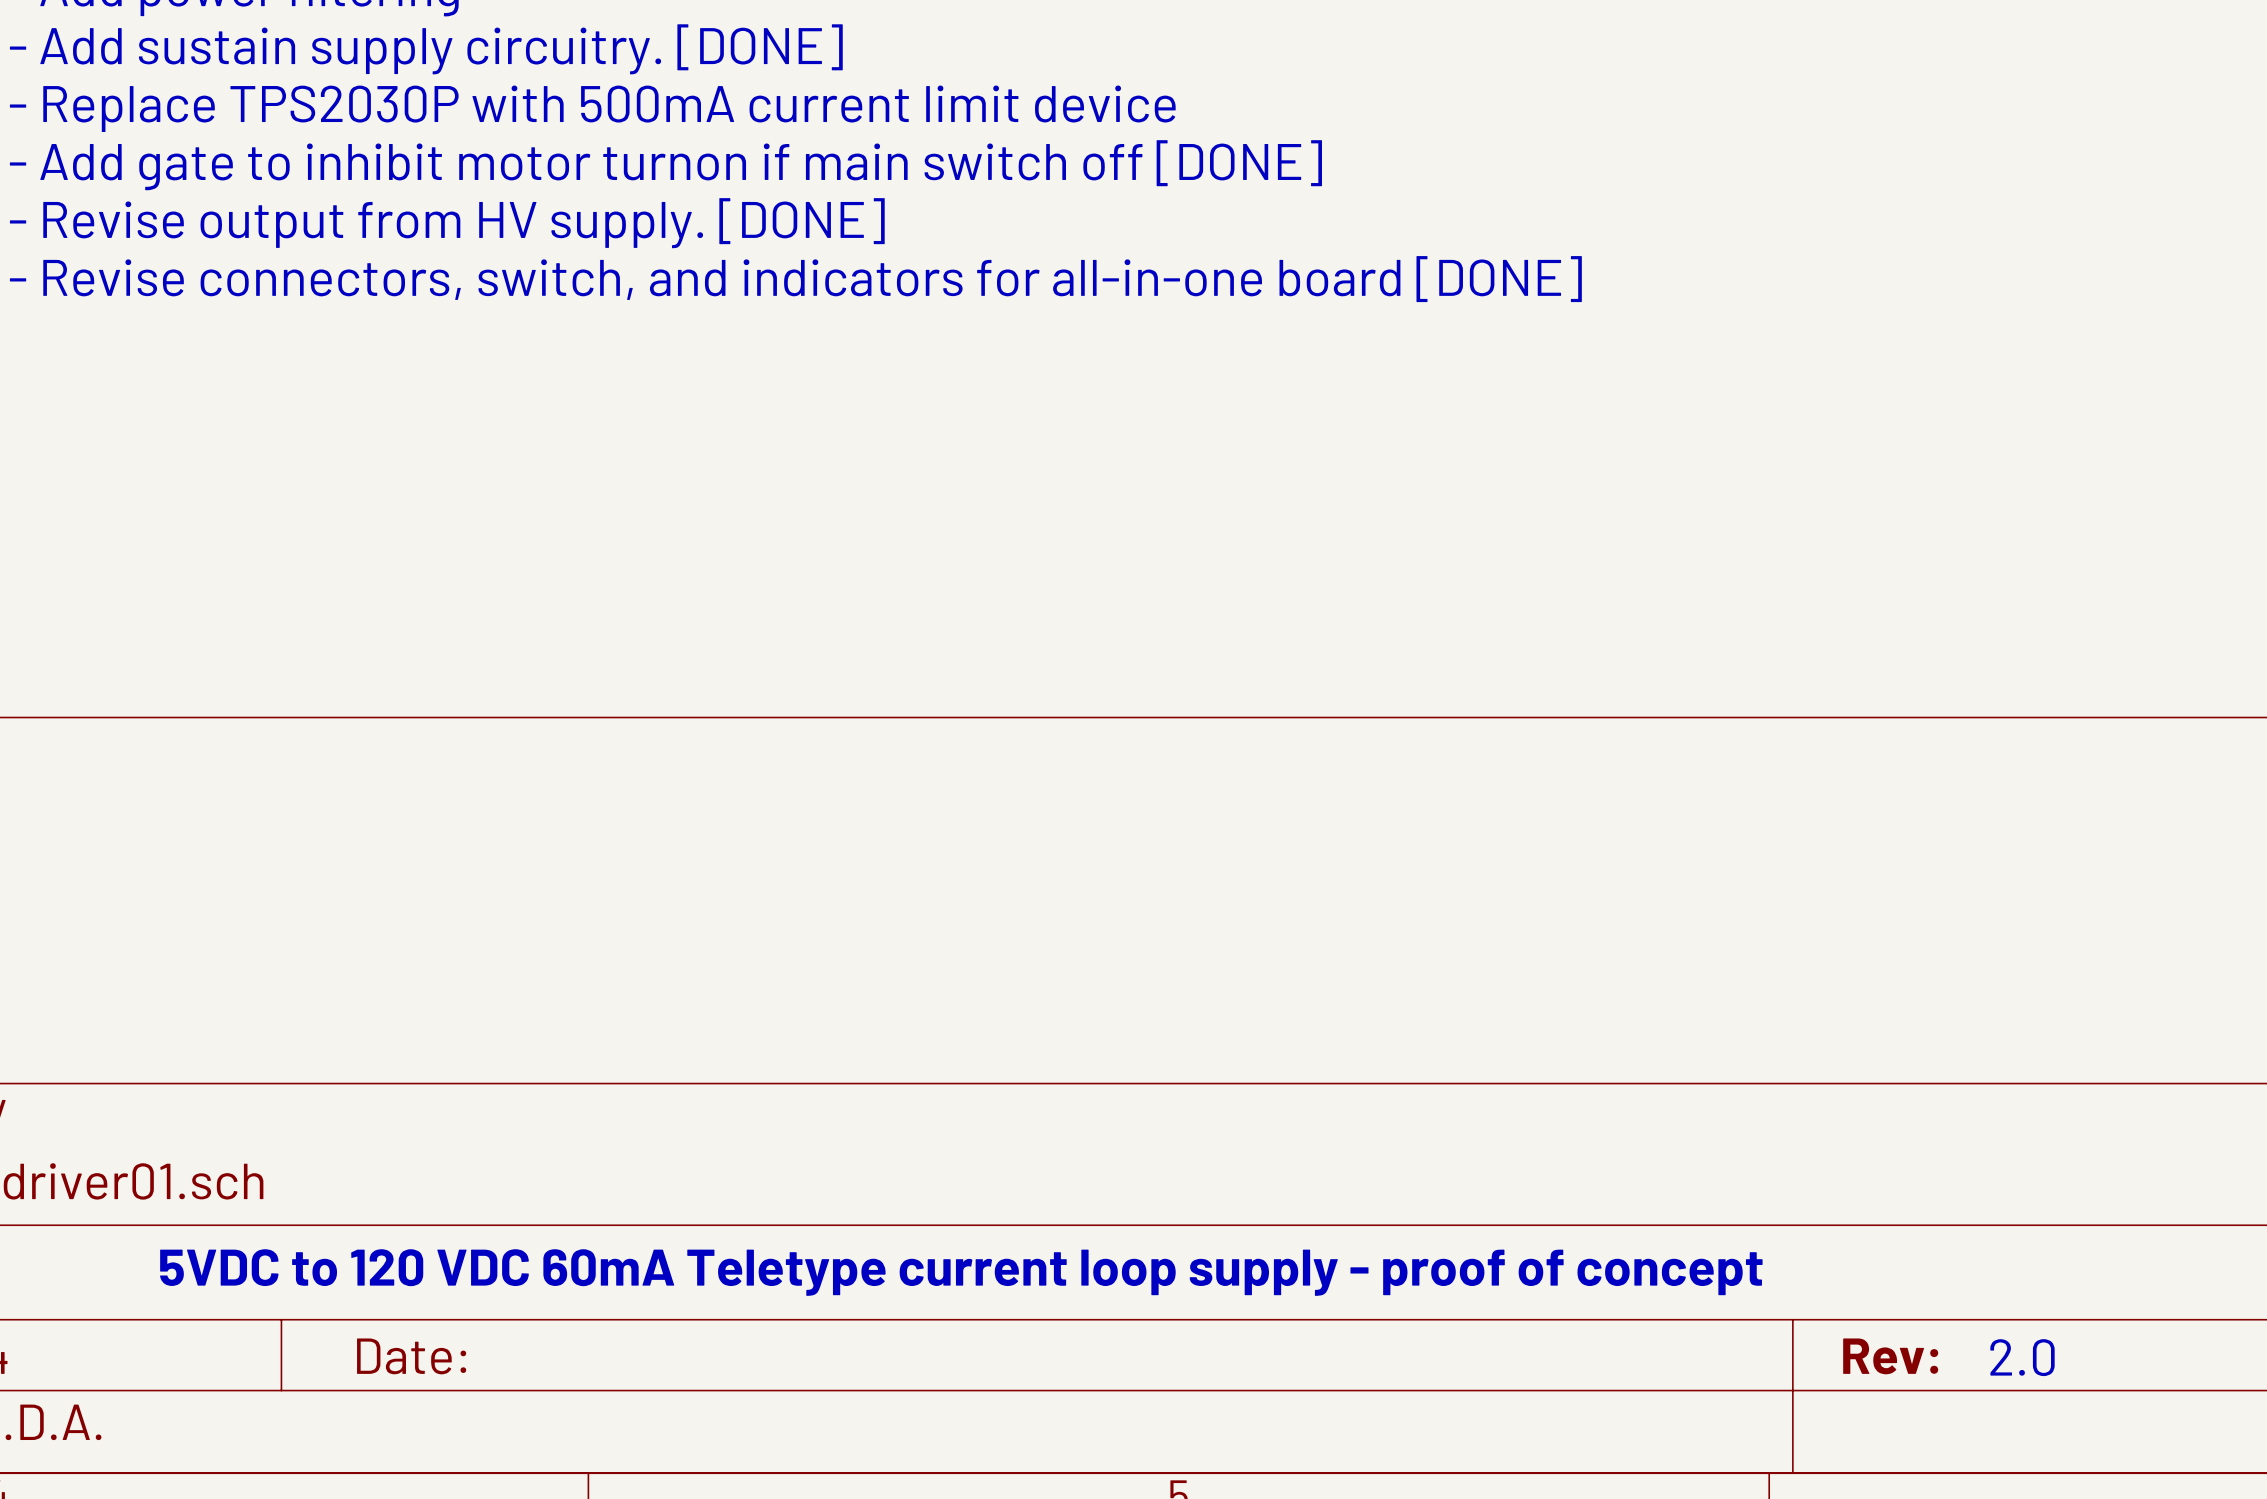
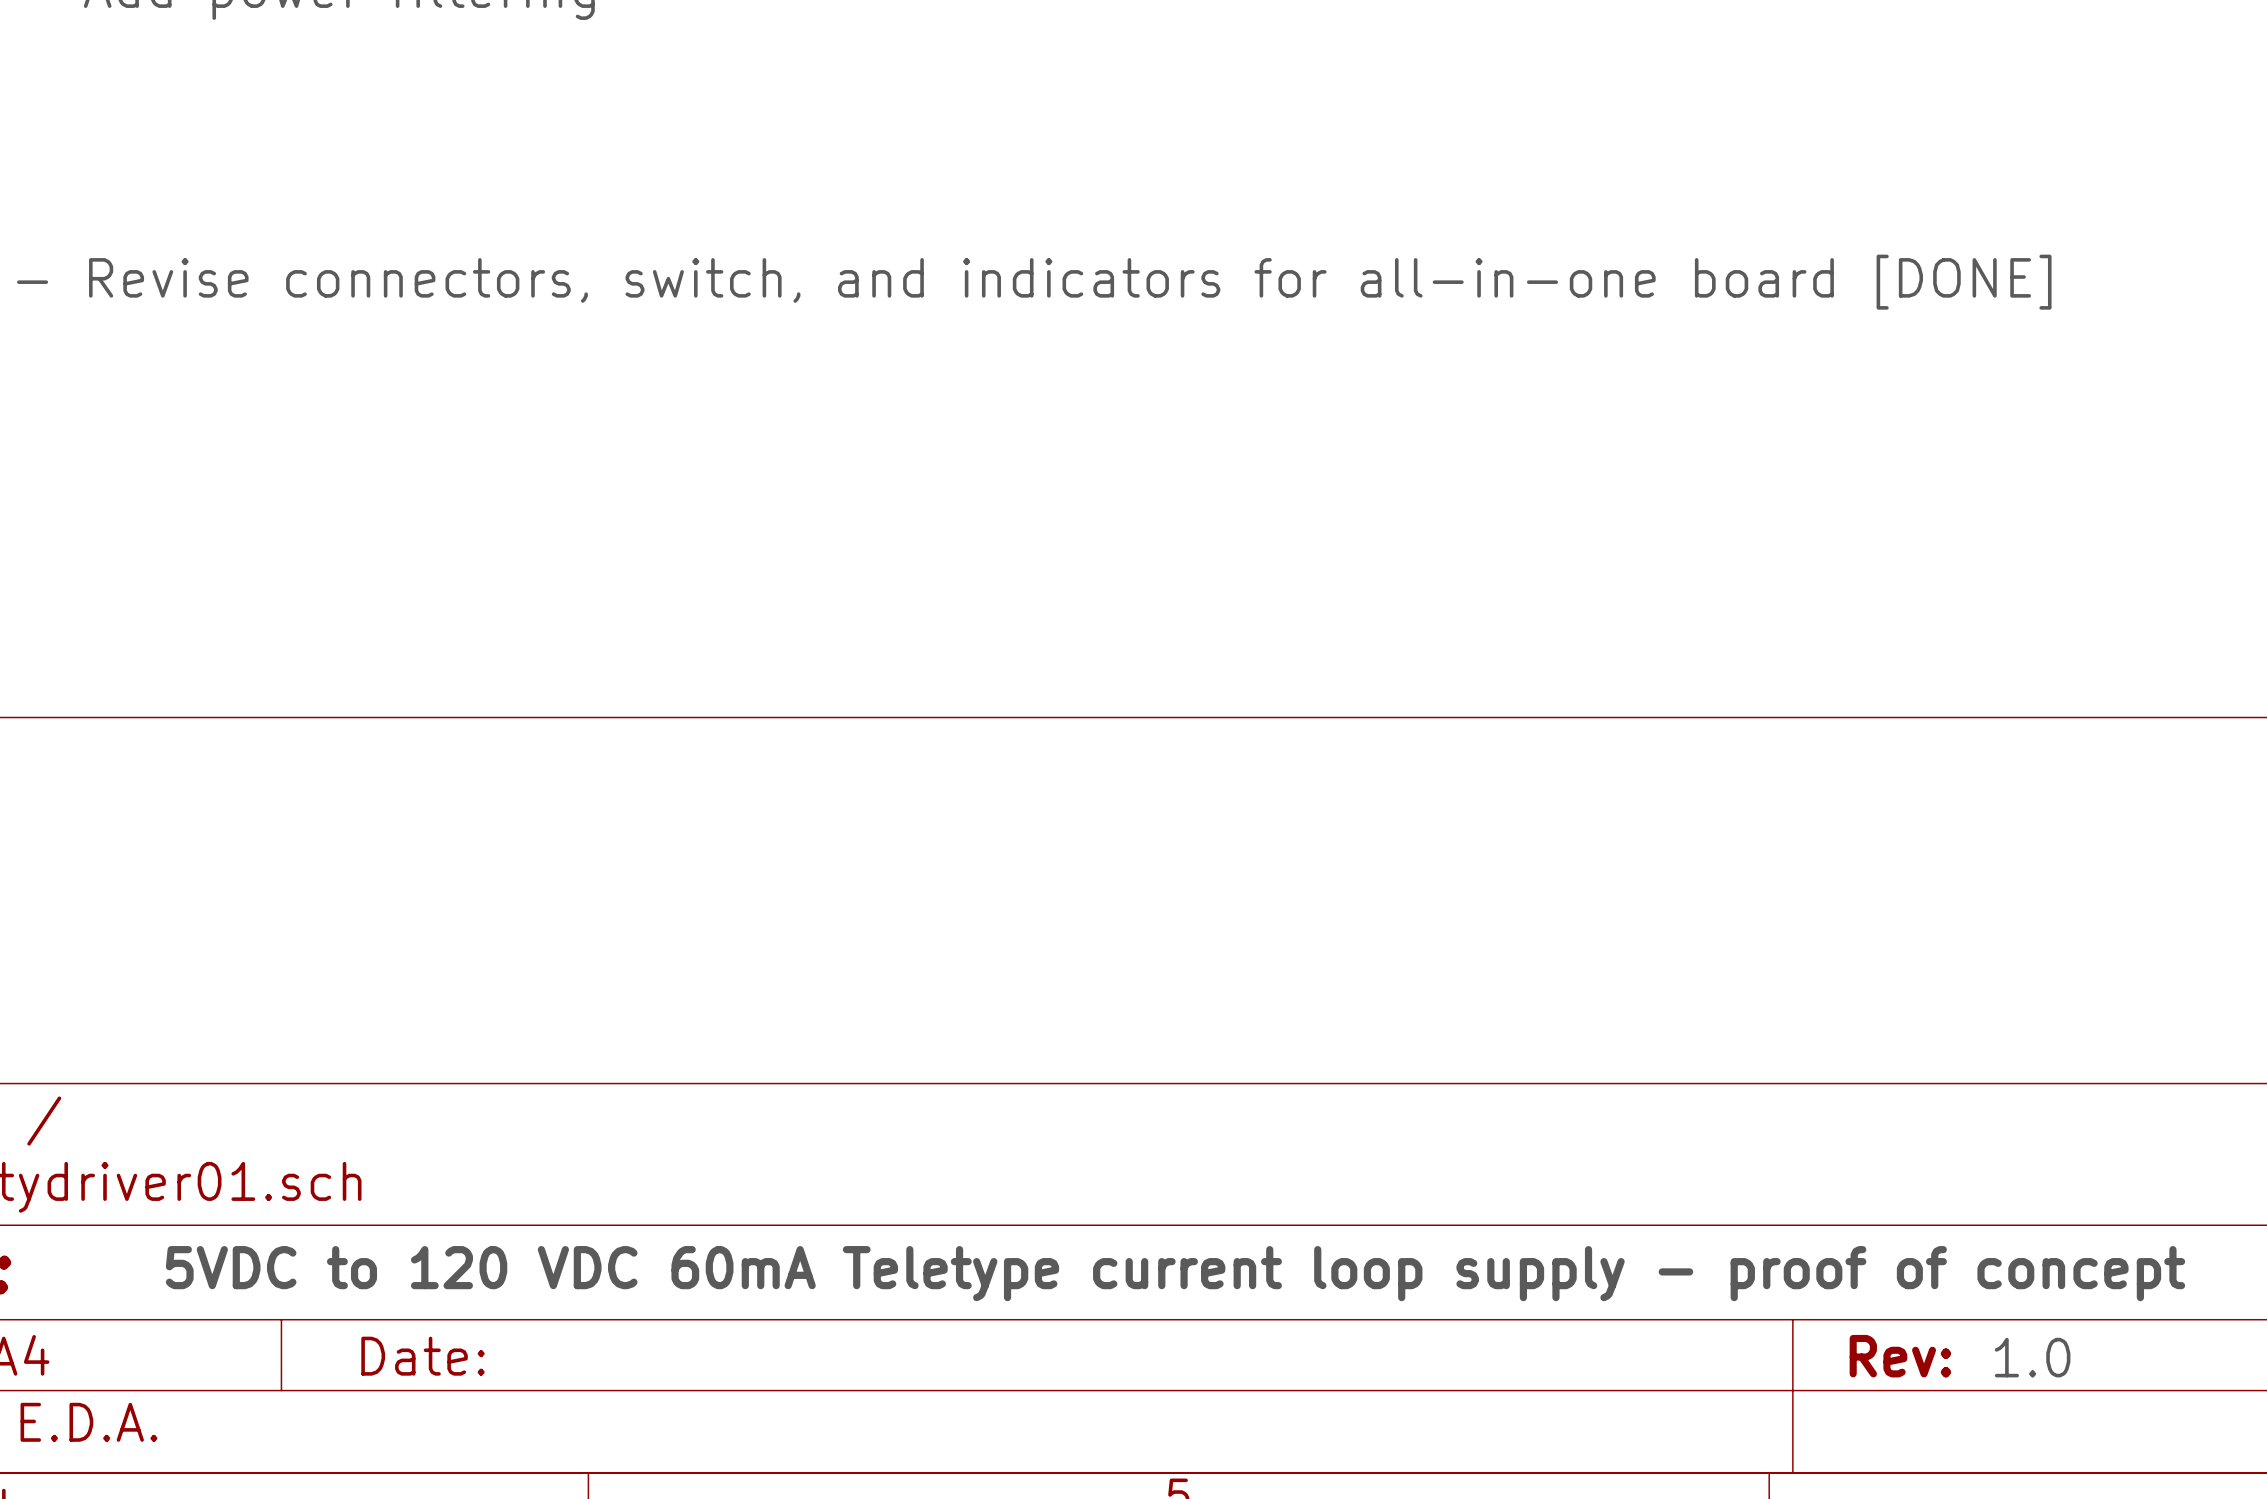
text: - Add sustain supply circuitry. [DONE] (426, 49) -> none
text: - Replace TPS2030P with 500mA current limit device (592, 108) -> none
text: - Add gate to inhibit motor turnon if main switch off [DONE] (665, 165) -> none
text: - Revise output from HV supply. [DONE] (447, 223) -> none
text: 2.0 (2022, 1357) -> 1.0 (2032, 1357)

